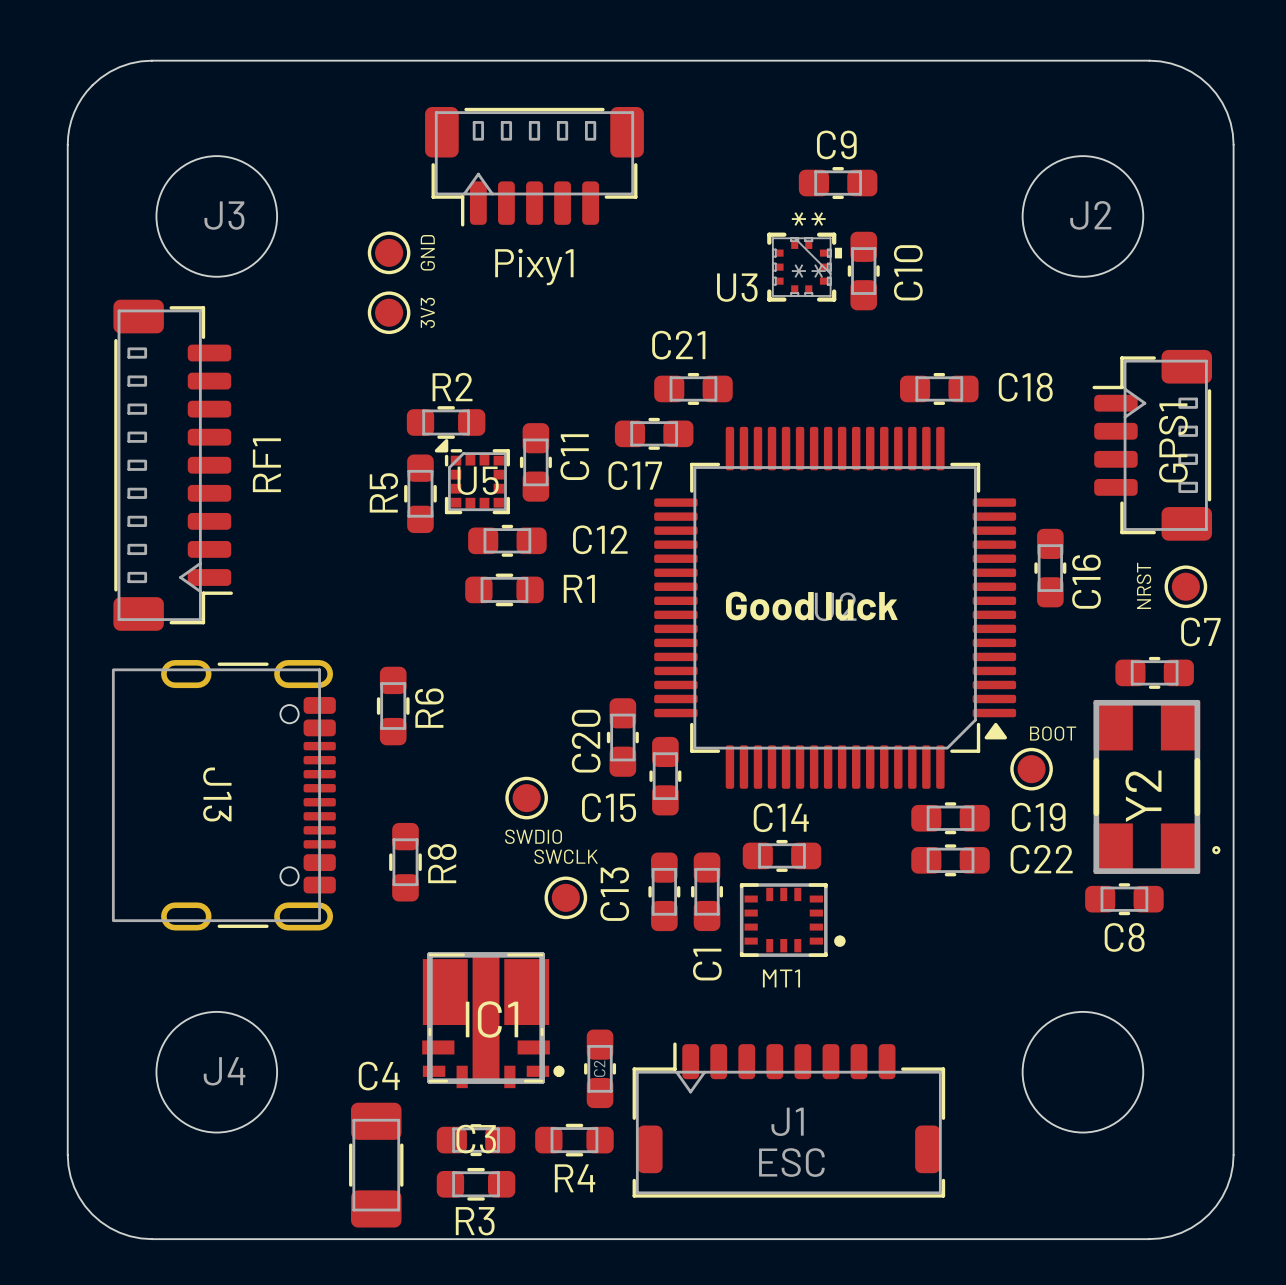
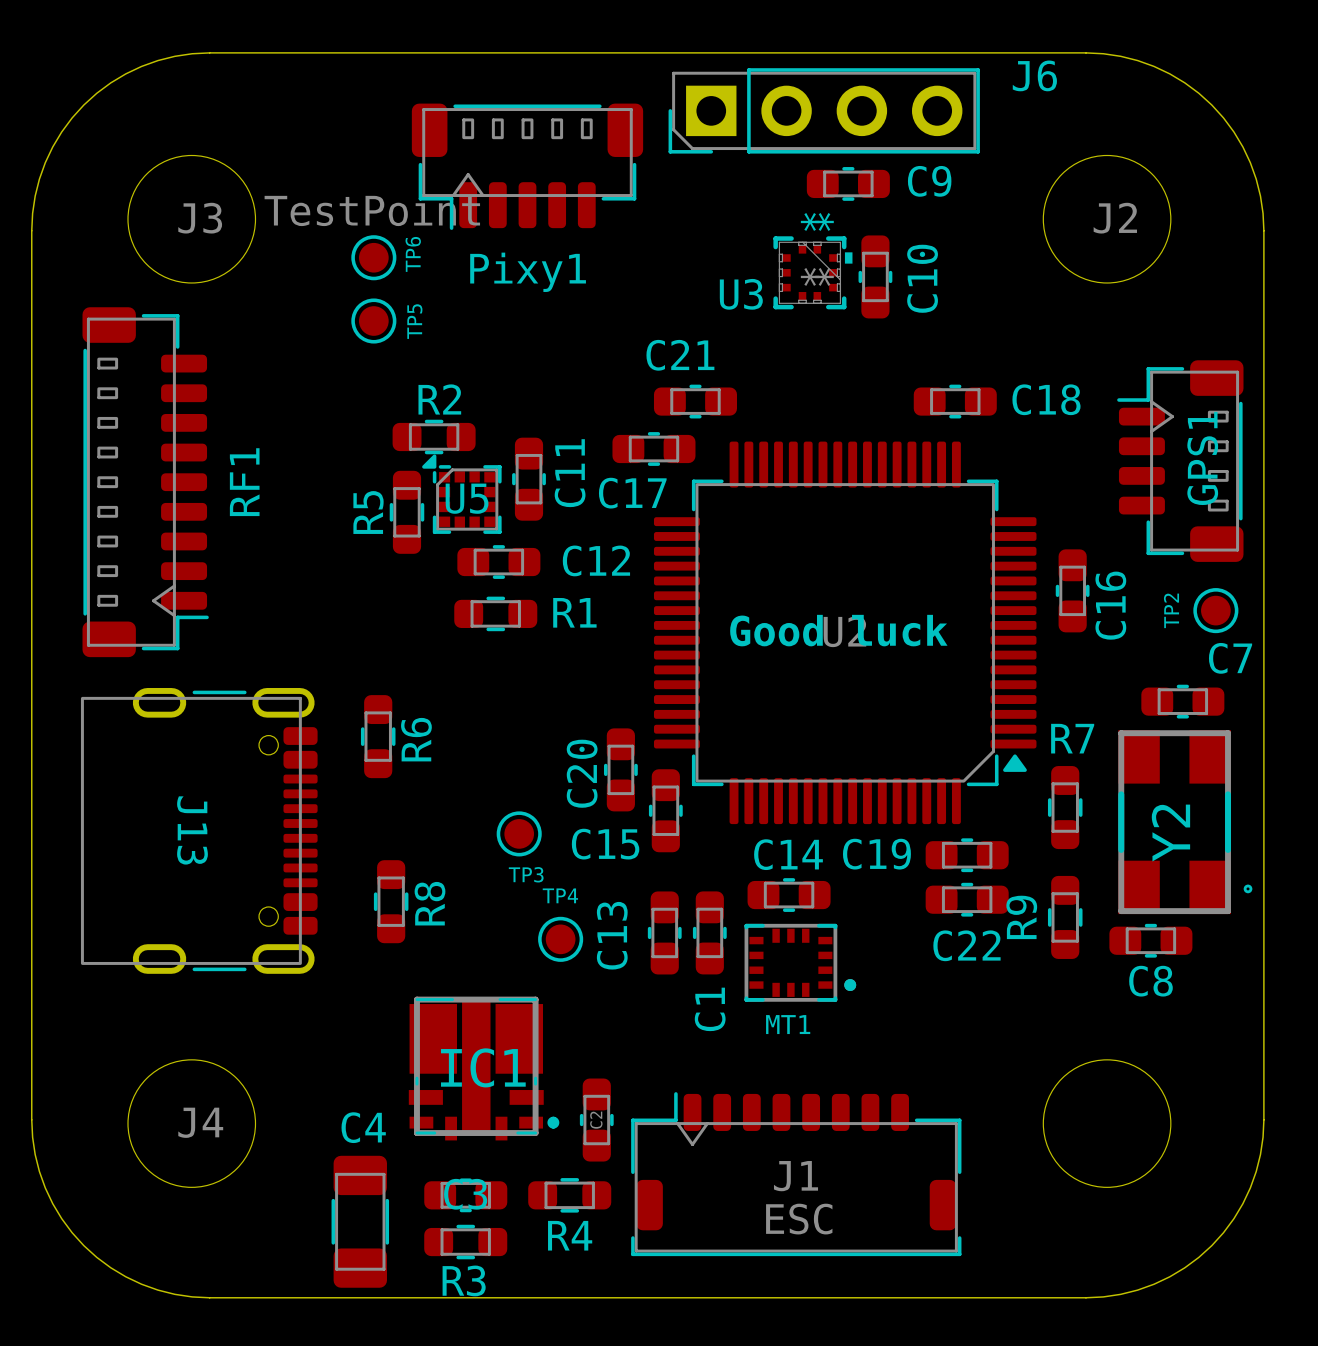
board edge: (151, 60) (1149, 60) (1181, 67) (1208, 85) (1227, 112) (1233, 144) (1233, 1154) (1227, 1187) (1208, 1214) (1181, 1232) (1149, 1239) (151, 1239) (119, 1232) (92, 1214) (74, 1187) (67, 1154) (68, 136) (71, 120) (77, 105) (92, 85) (119, 67) (151, 60) -> (209, 52) (174, 56) (141, 66) (110, 82) (83, 105) (61, 131) (45, 162) (39, 179) (32, 213) (31, 1119) (32, 1137) (39, 1171) (52, 1203) (72, 1232) (96, 1257) (110, 1267) (141, 1284) (174, 1294) (209, 1297) (1085, 1297) (1103, 1296) (1137, 1290) (1169, 1276) (1198, 1257) (1223, 1232) (1242, 1203) (1250, 1187) (1260, 1154) (1263, 1119) (1263, 230) (1260, 196) (1250, 162) (1233, 131) (1223, 117) (1198, 93) (1169, 73) (1137, 60) (1103, 53) (209, 52)
J6: none -> (824, 110)
C9 name position: C9 (836, 144) -> C9 (929, 181)
GND value: none -> TestPoint (372, 210)
GND name: GND (427, 252) -> TP6 (413, 254)
3V3 name: 3V3 (427, 312) -> TP5 (414, 321)
NRST name: NRST (1144, 585) -> TP2 (1171, 610)
BOOT: (1031, 769) -> none
R7: none -> (1065, 807)
C19 name position: C19 (1038, 817) -> C19 (876, 854)
SWDIO name: SWDIO (533, 836) -> TP3 (526, 874)
SWCLK name: SWCLK (566, 856) -> TP4 (560, 895)
C22 name position: C22 (1041, 859) -> C22 (966, 945)
R9: none -> (1065, 917)

